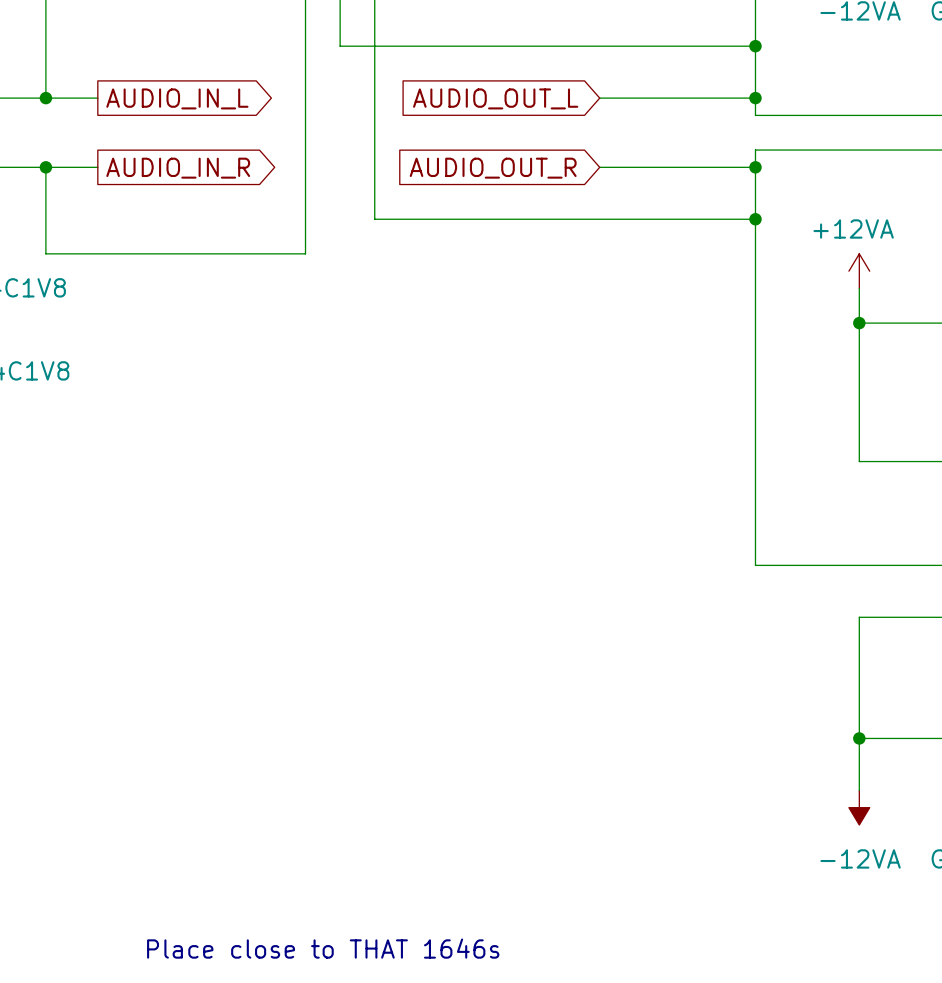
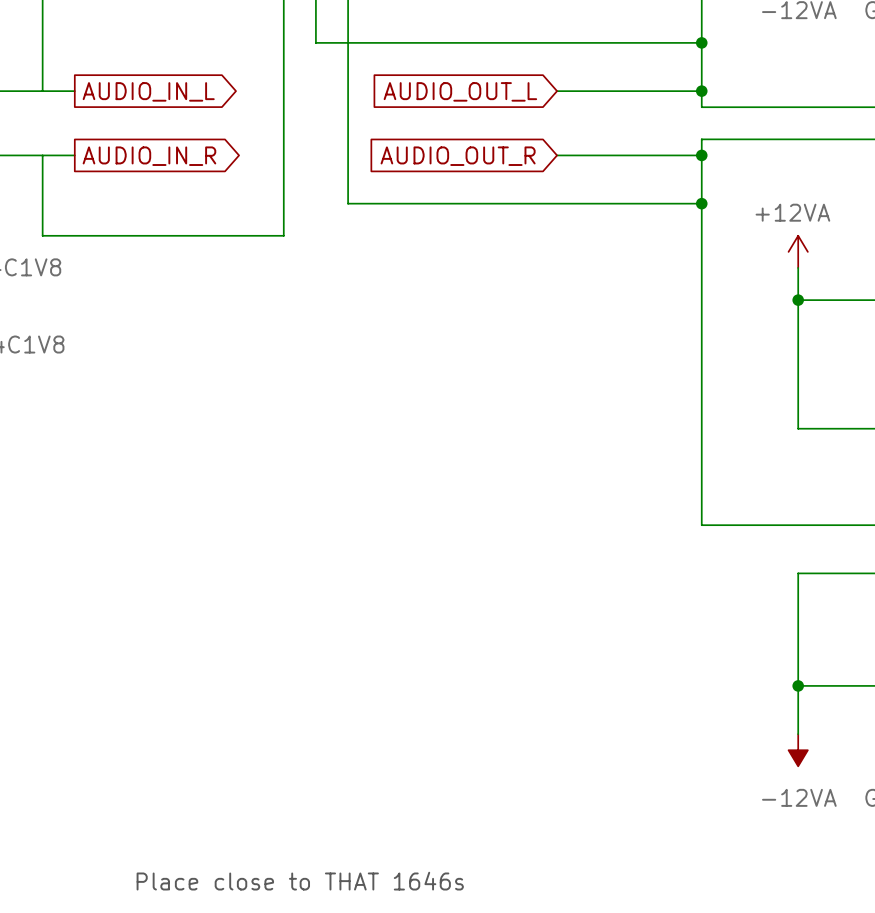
junction: (45, 98) -> none
wire: (80, 98) (97, 98) -> none
global label position: AUDIO_IN_L (177, 98) -> AUDIO_IN_L (148, 91)
junction: (45, 167) -> none
wire: (80, 167) (97, 167) -> none
global label position: AUDIO_IN_R (178, 168) -> AUDIO_IN_R (149, 156)

